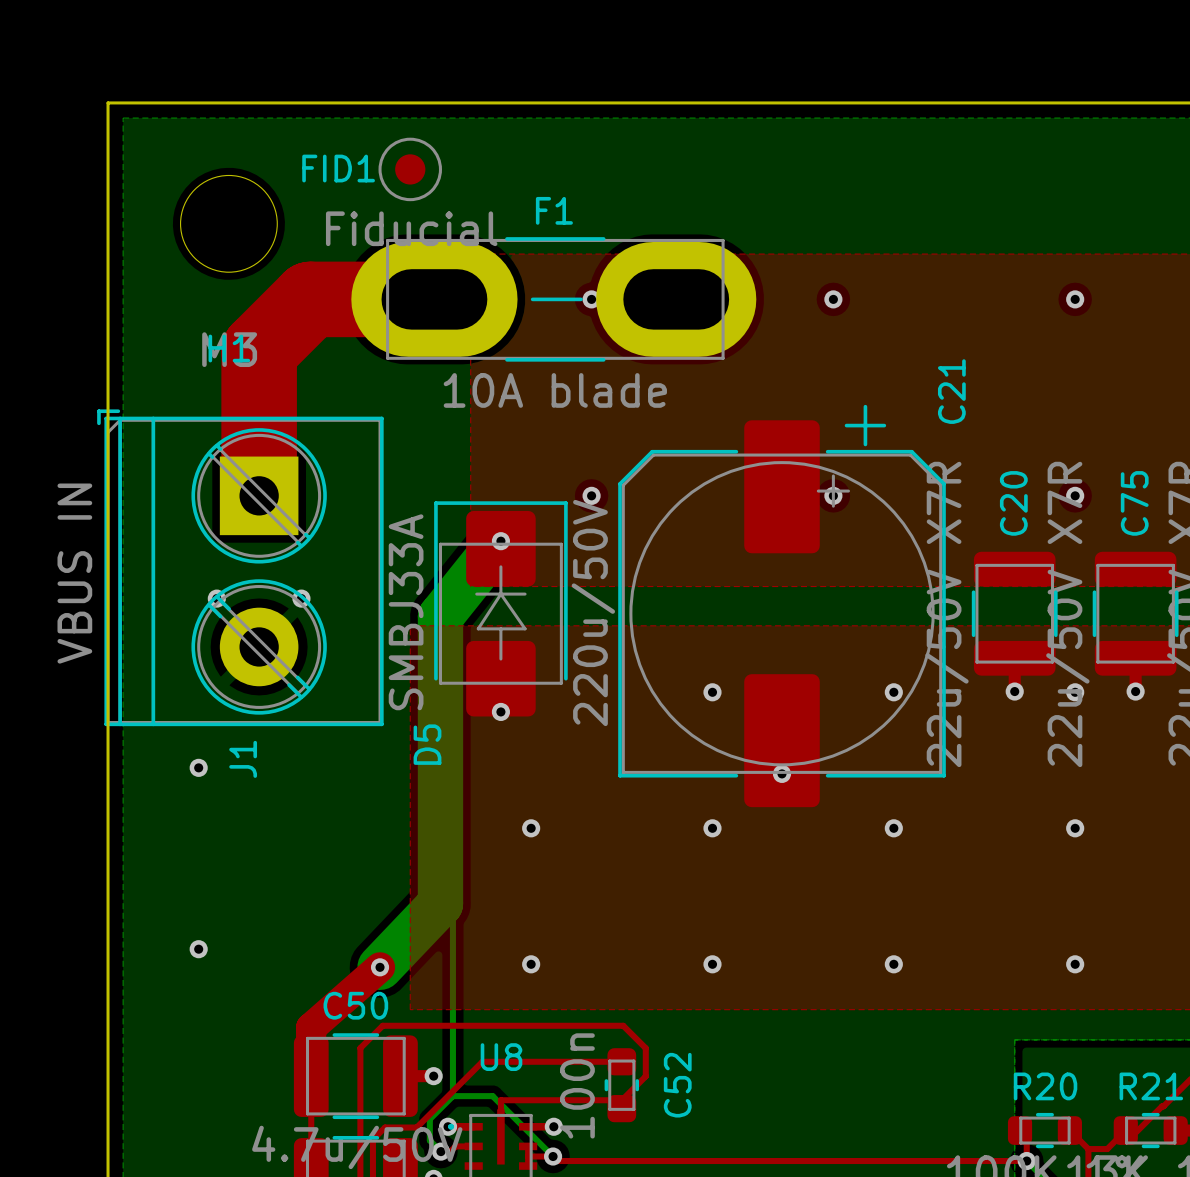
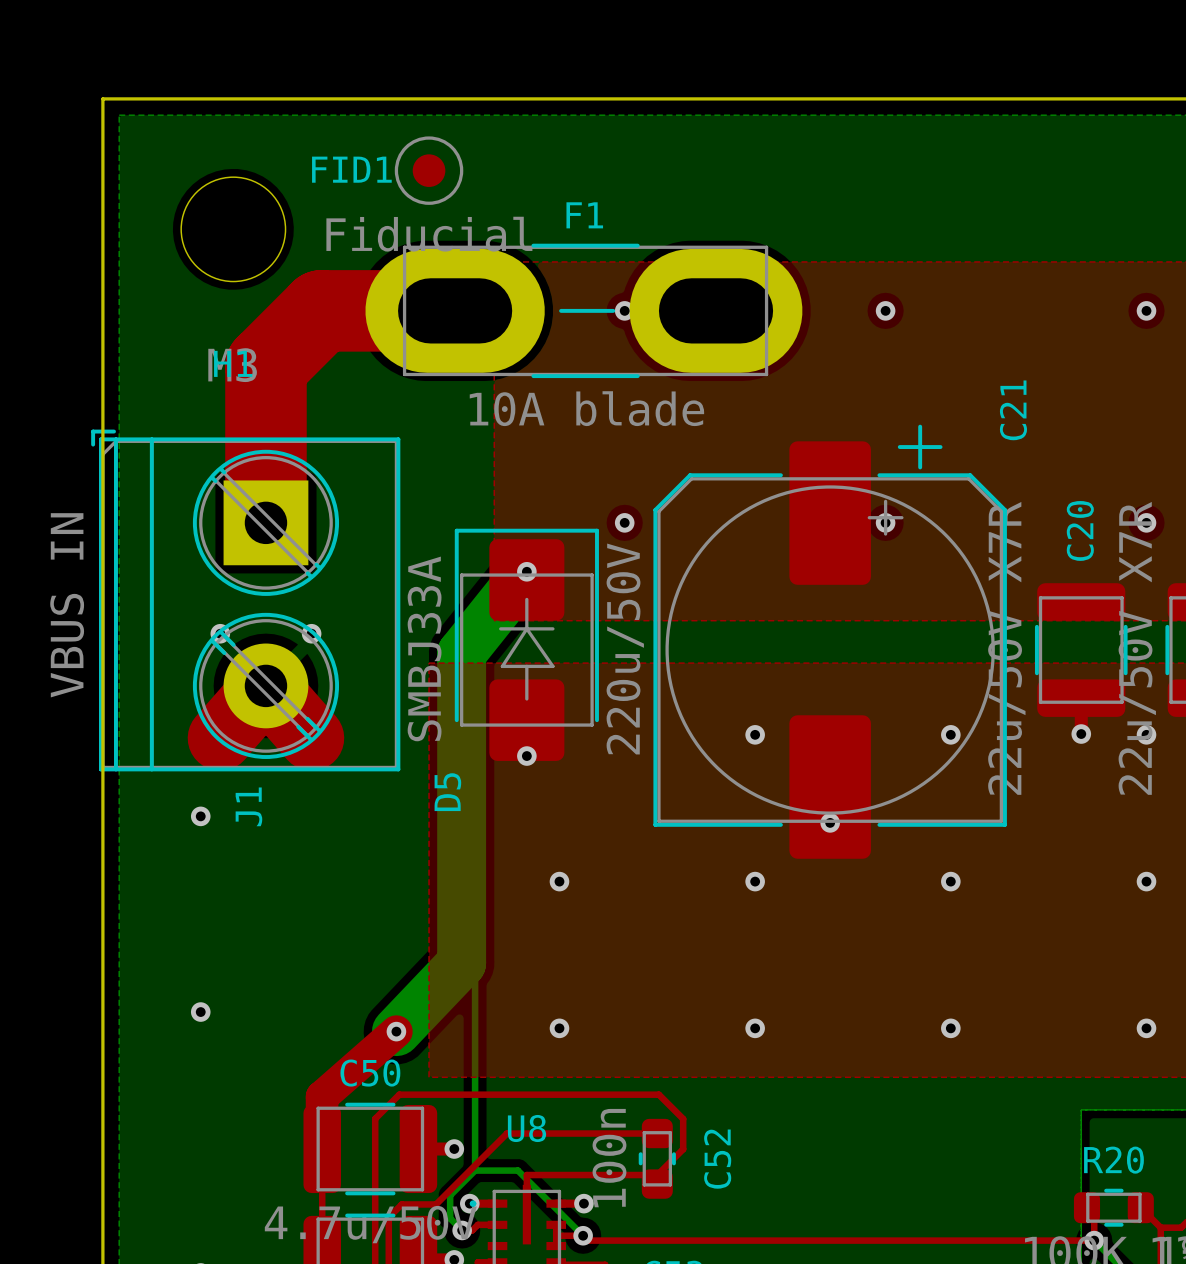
top track: none -> (220, 738) (265, 685) (311, 738)

